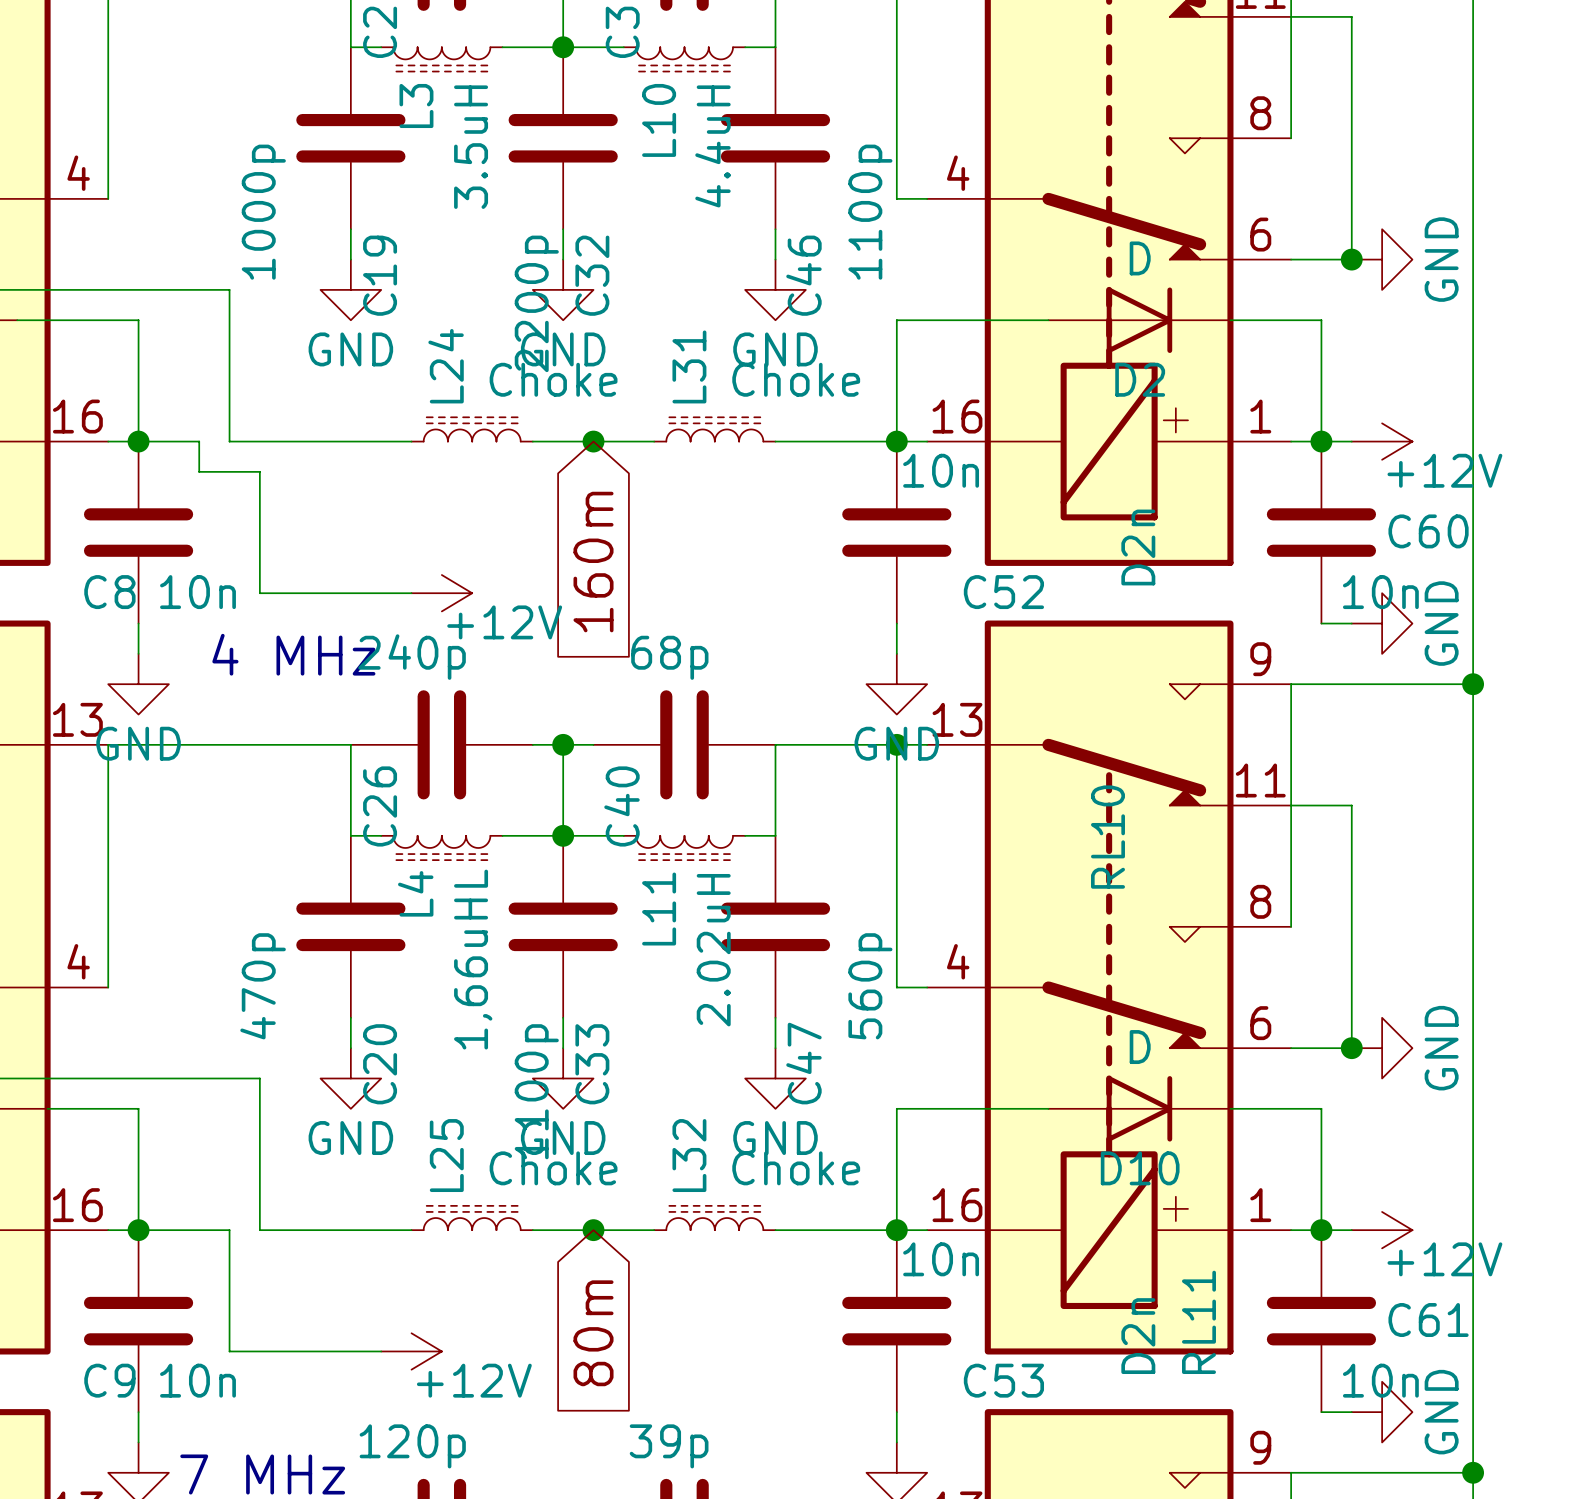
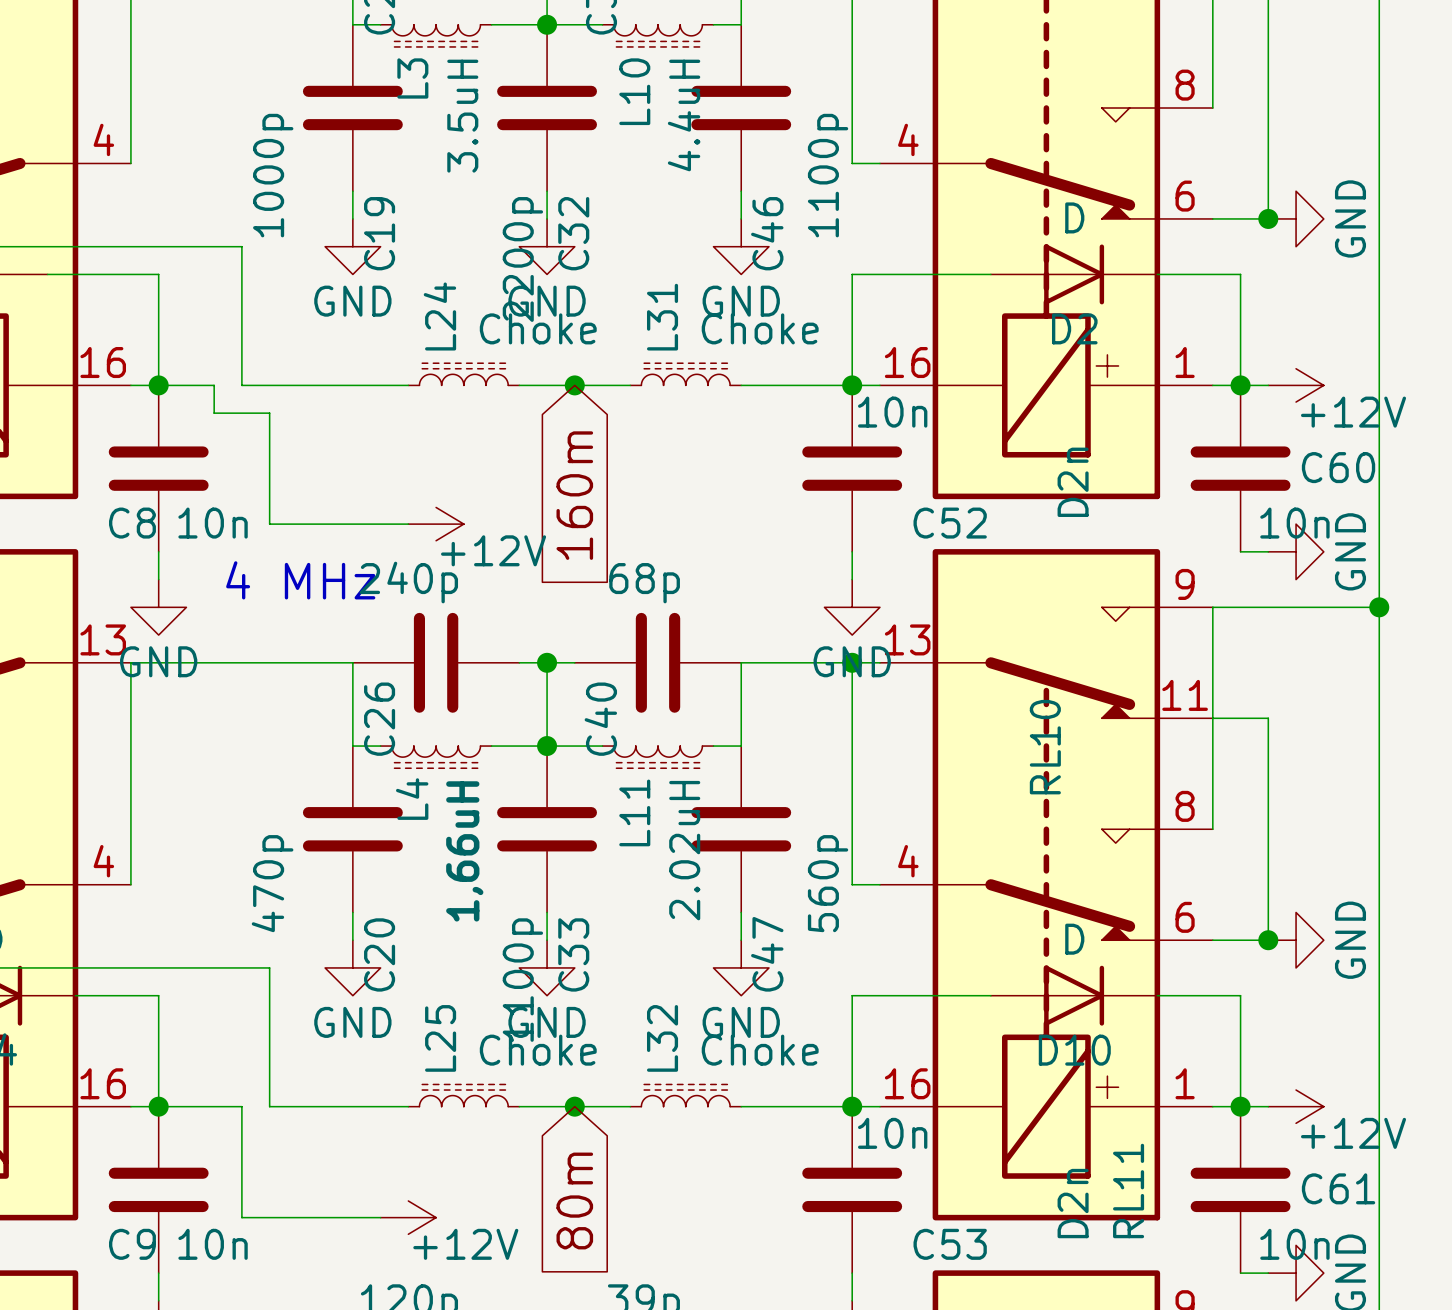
L4 value: 1,66uHL (473, 959) -> 1,66uH (464, 851)

